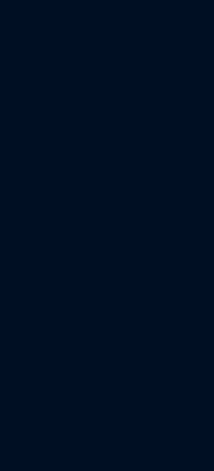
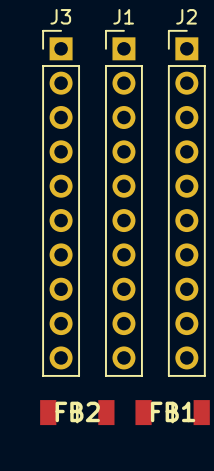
J3: none -> (61, 203)
J1: none -> (123, 203)
J2: none -> (186, 203)
FB2: none -> (77, 412)
FB1: none -> (172, 412)

